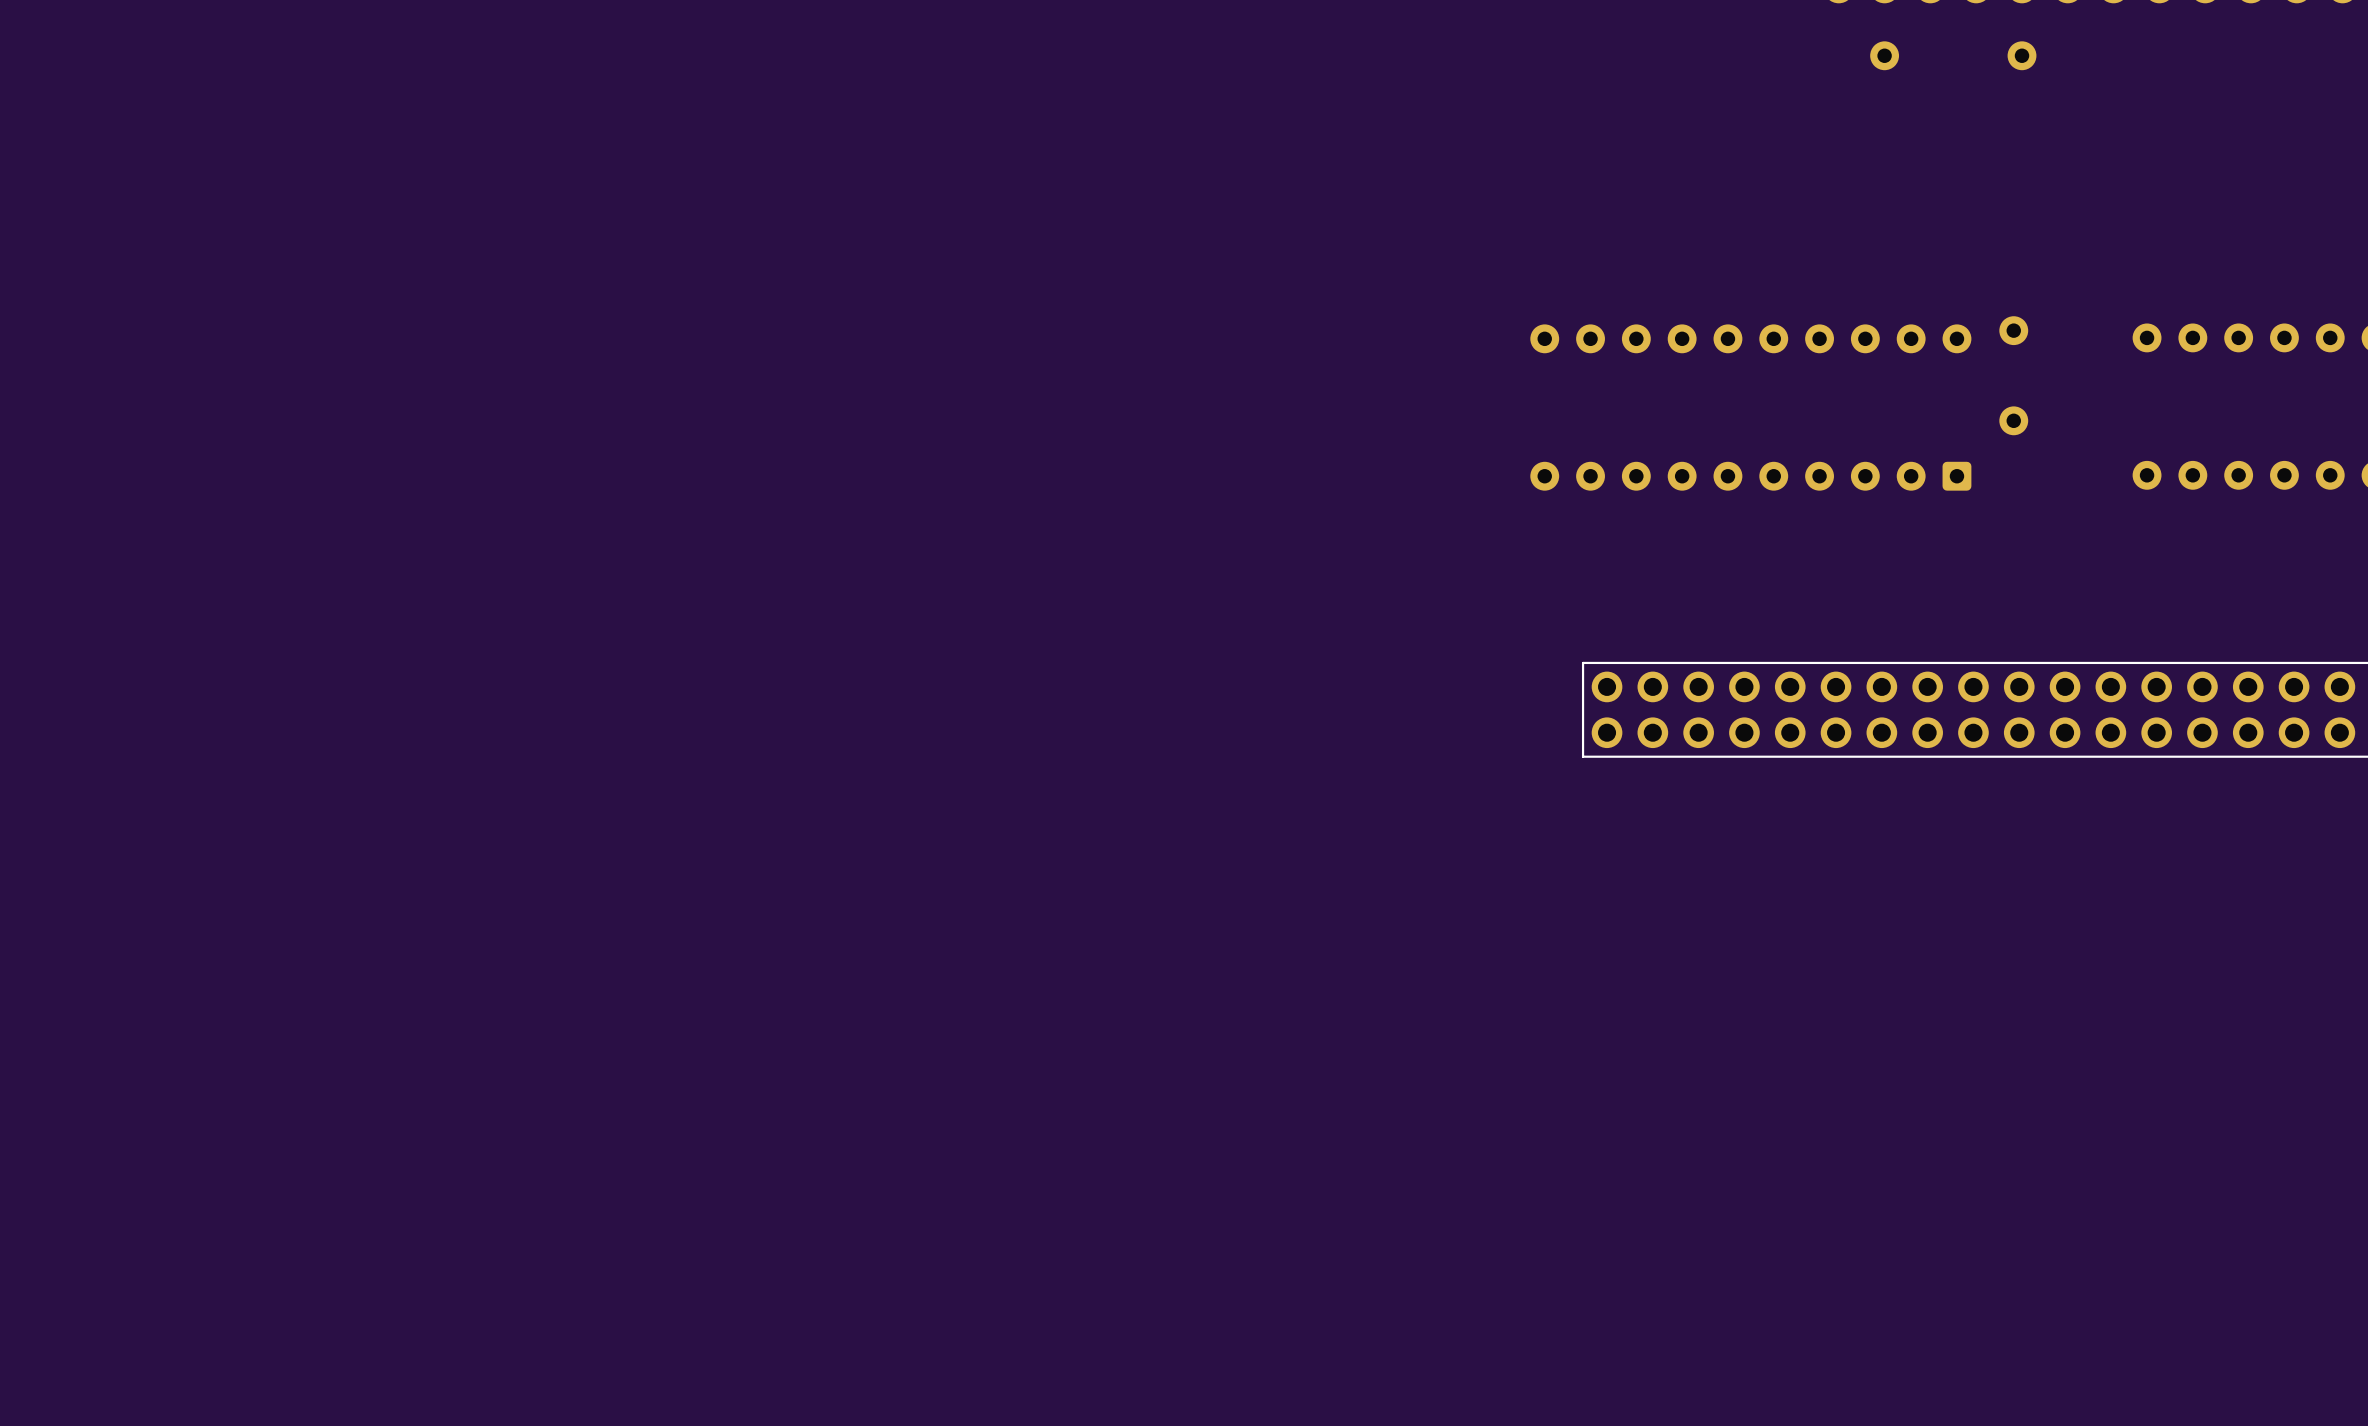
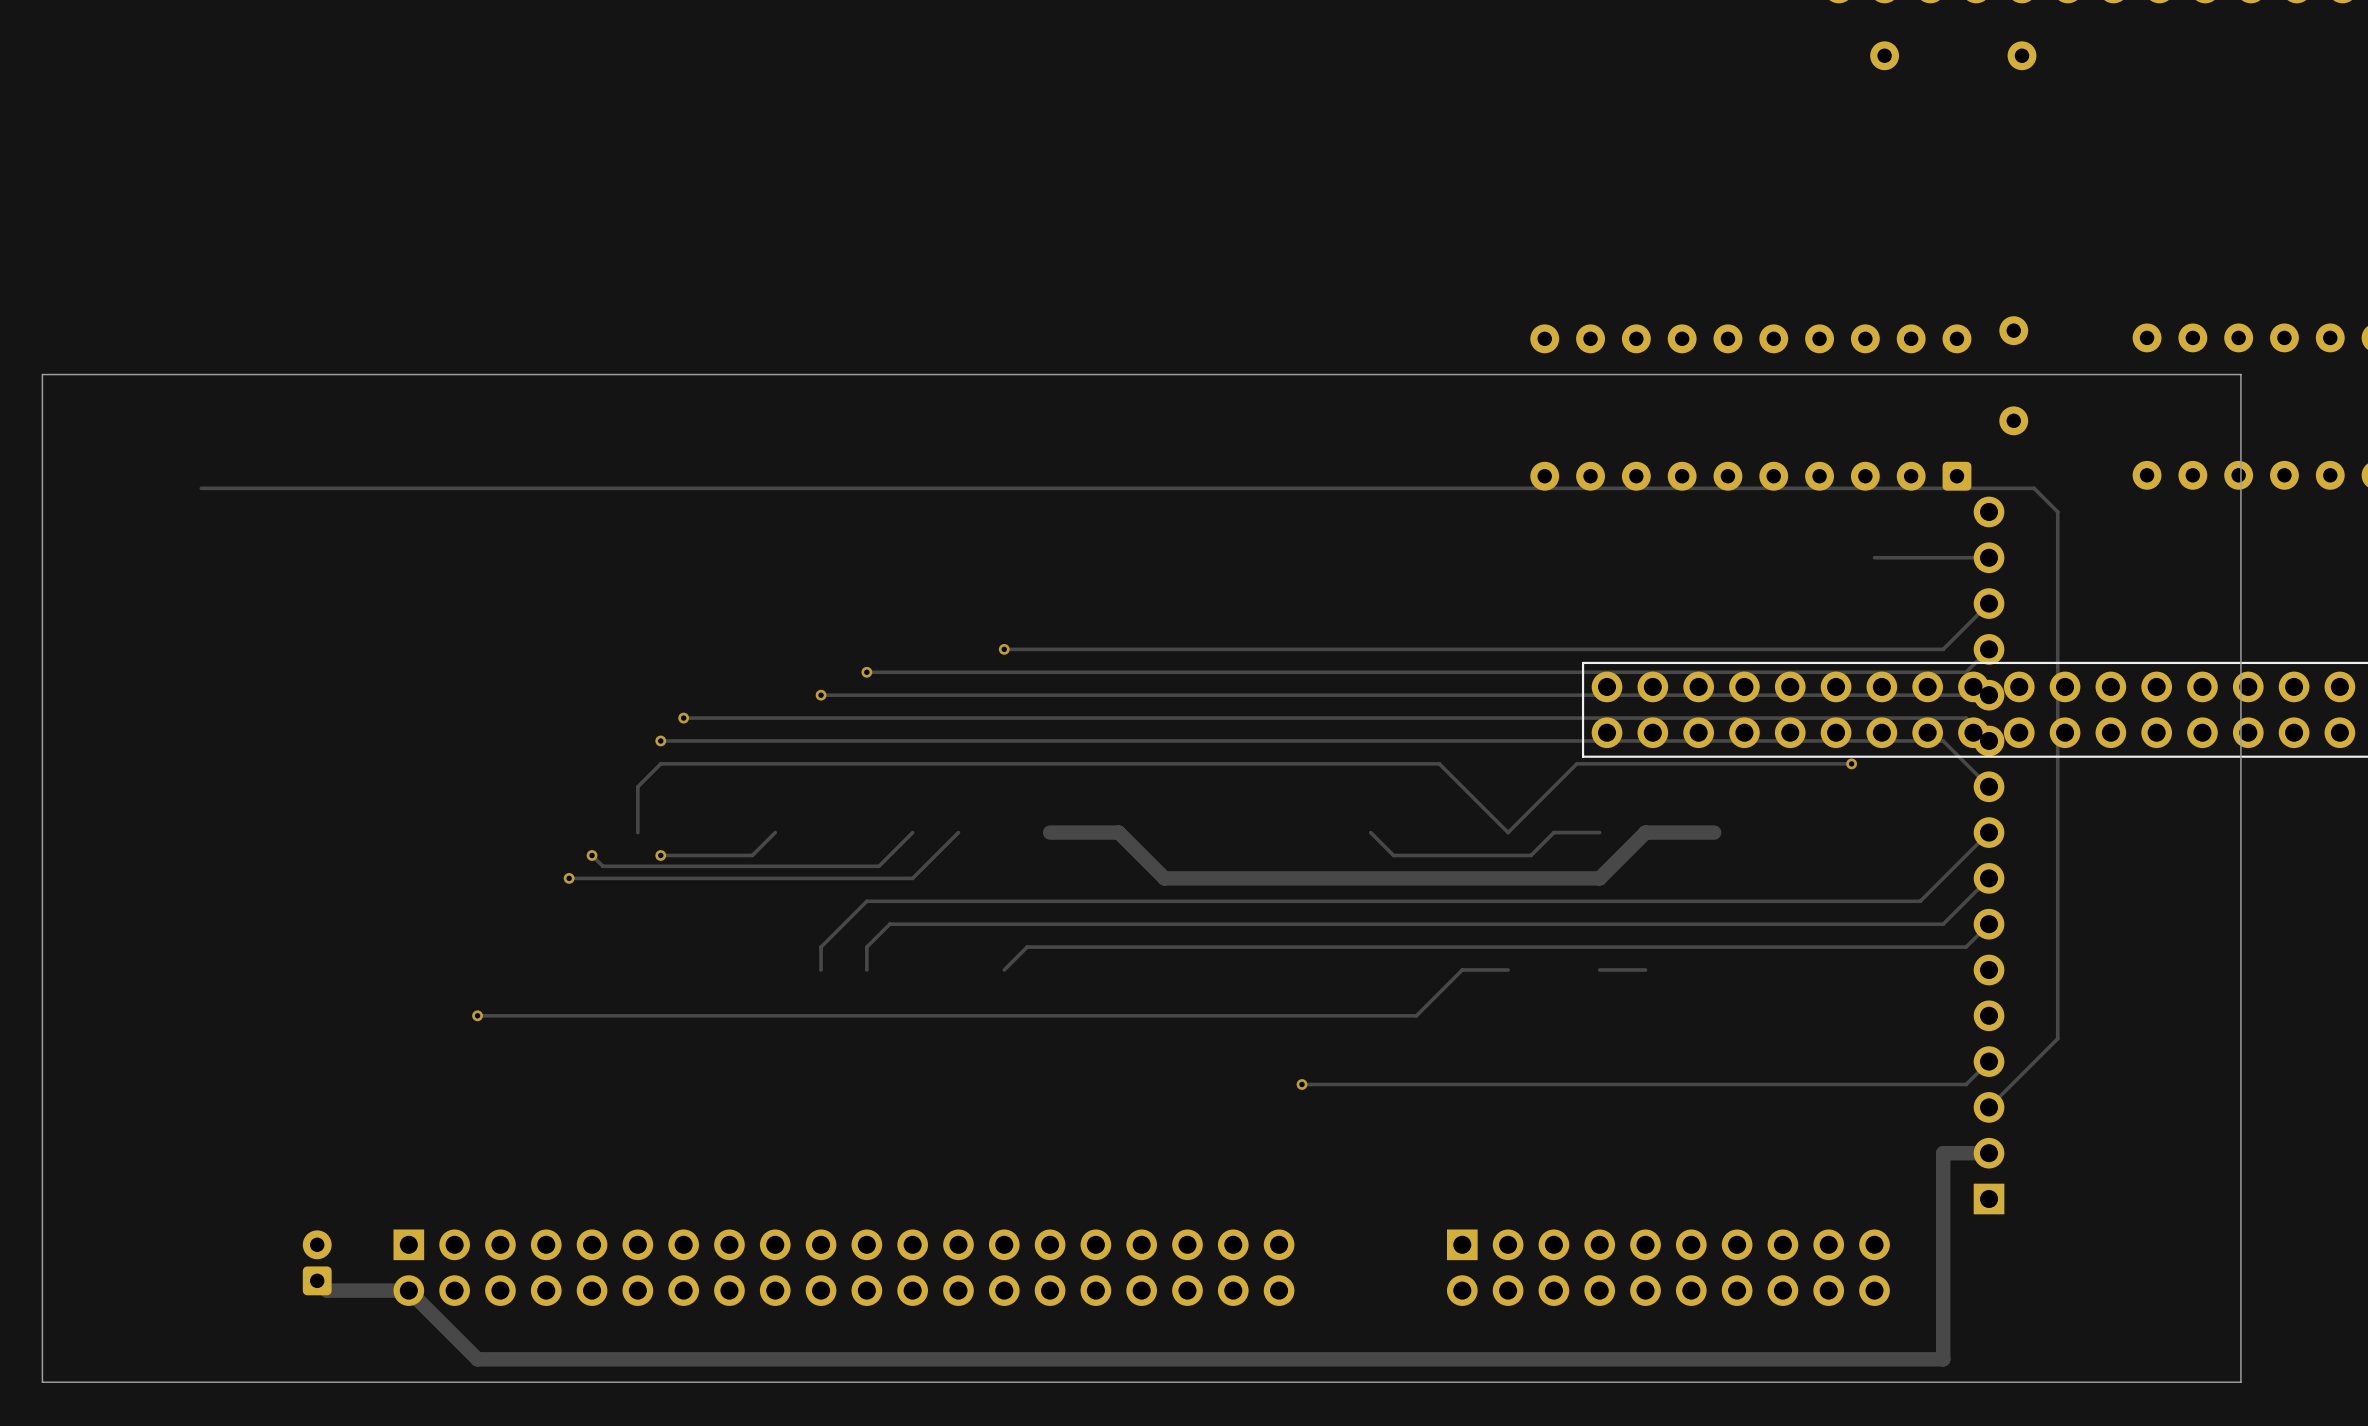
board edge: none -> (2240, 374) (42, 374) (42, 1382) (2240, 1382) (2240, 374)
track: none -> (201, 488) (2034, 488) (2057, 511) (2057, 1038) (1989, 1107)
track: none -> (1989, 557) (1874, 557)
track: none -> (1989, 603) (1943, 649) (1004, 649)
via: none -> (1004, 649)
track: none -> (1989, 649) (1966, 672) (866, 672)
via: none -> (866, 672)
via: none -> (821, 695)
track: none -> (1989, 695) (821, 695)
track: none -> (683, 718) (1966, 718) (1989, 740)
via: none -> (683, 718)
track: none -> (660, 740) (1943, 740) (1989, 786)
via: none -> (660, 740)
track: none -> (1851, 763) (1576, 763) (1508, 832) (1439, 763) (660, 763) (637, 786) (637, 832)
via: none -> (1851, 763)
track: none -> (775, 832) (752, 855) (660, 855)
track: none -> (912, 832) (878, 866) (602, 866) (592, 855)
track: none -> (958, 832) (912, 878) (569, 878)
track: none -> (1599, 832) (1553, 832) (1531, 855) (1393, 855) (1370, 832)
track: none -> (1714, 832) (1645, 832) (1599, 878) (1164, 878) (1118, 832) (1050, 832)
track: none -> (1989, 832) (1920, 901) (866, 901) (821, 947) (821, 969)
via: none -> (592, 855)
via: none -> (660, 855)
part: none -> (1989, 855)
via: none -> (569, 878)
track: none -> (1989, 878) (1943, 924) (889, 924) (866, 947) (866, 969)
track: none -> (1989, 924) (1966, 947) (1027, 947) (1004, 969)
track: none -> (1508, 969) (1462, 969) (1416, 1015) (477, 1015)
track: none -> (1645, 969) (1599, 969)
via: none -> (477, 1015)
track: none -> (1989, 1061) (1966, 1084) (1301, 1084)
via: none -> (1301, 1084)
track: none -> (1990, 1153) (1943, 1153) (1943, 1359) (477, 1359) (408, 1290) (326, 1290) (317, 1280)
part: none -> (317, 1262)
part: none -> (843, 1267)
part: none -> (1668, 1267)

